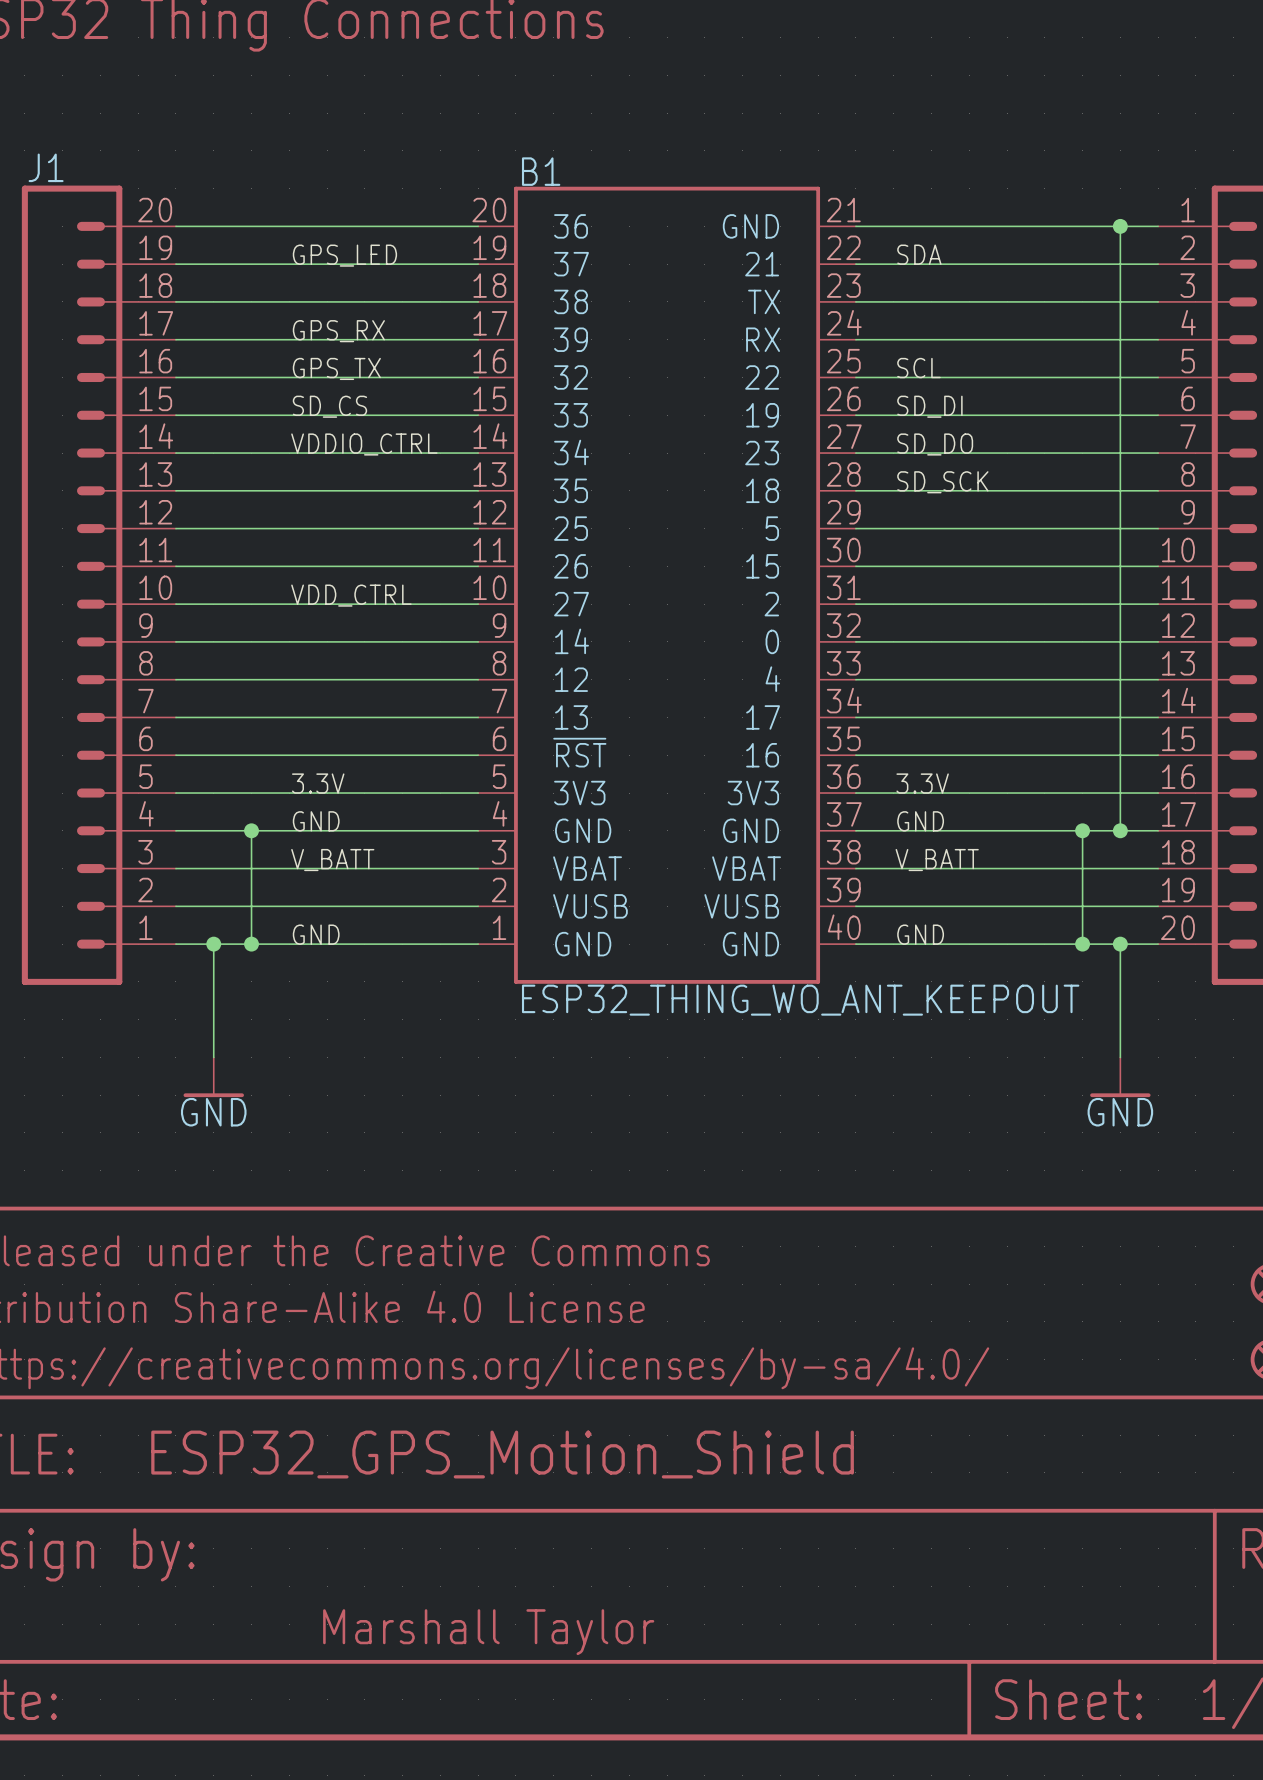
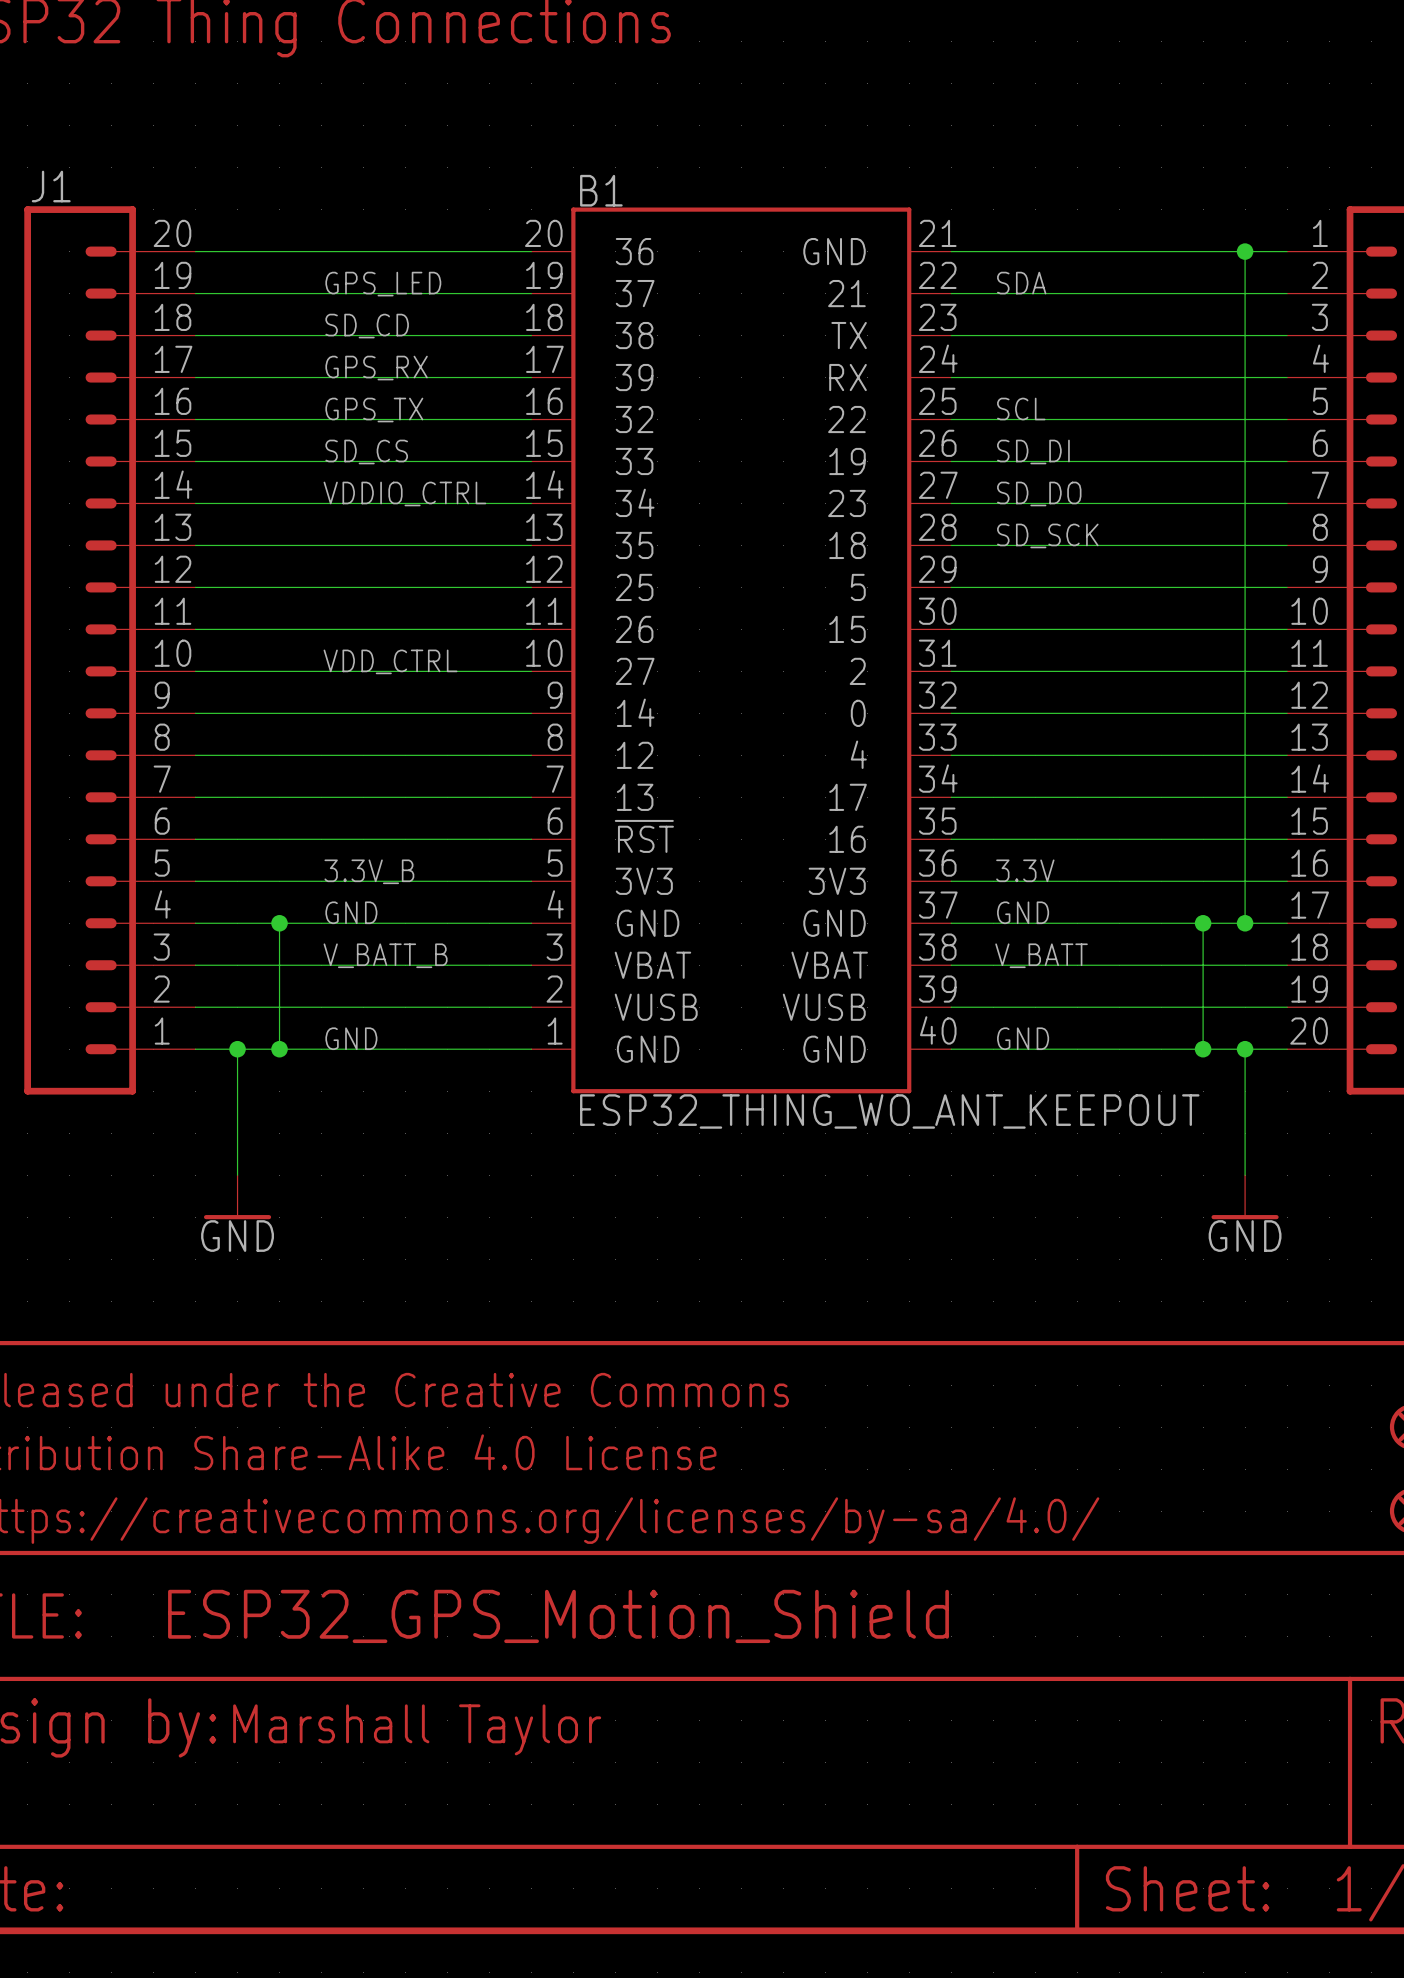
label: none -> SD_CD (367, 326)
label: 3.3V (318, 783) -> 3.3V_B (369, 871)
label: V_BATT (332, 860) -> V_BATT_B (385, 955)
text position: Marshall Taylor (488, 1632) -> Marshall Taylor (417, 1729)

